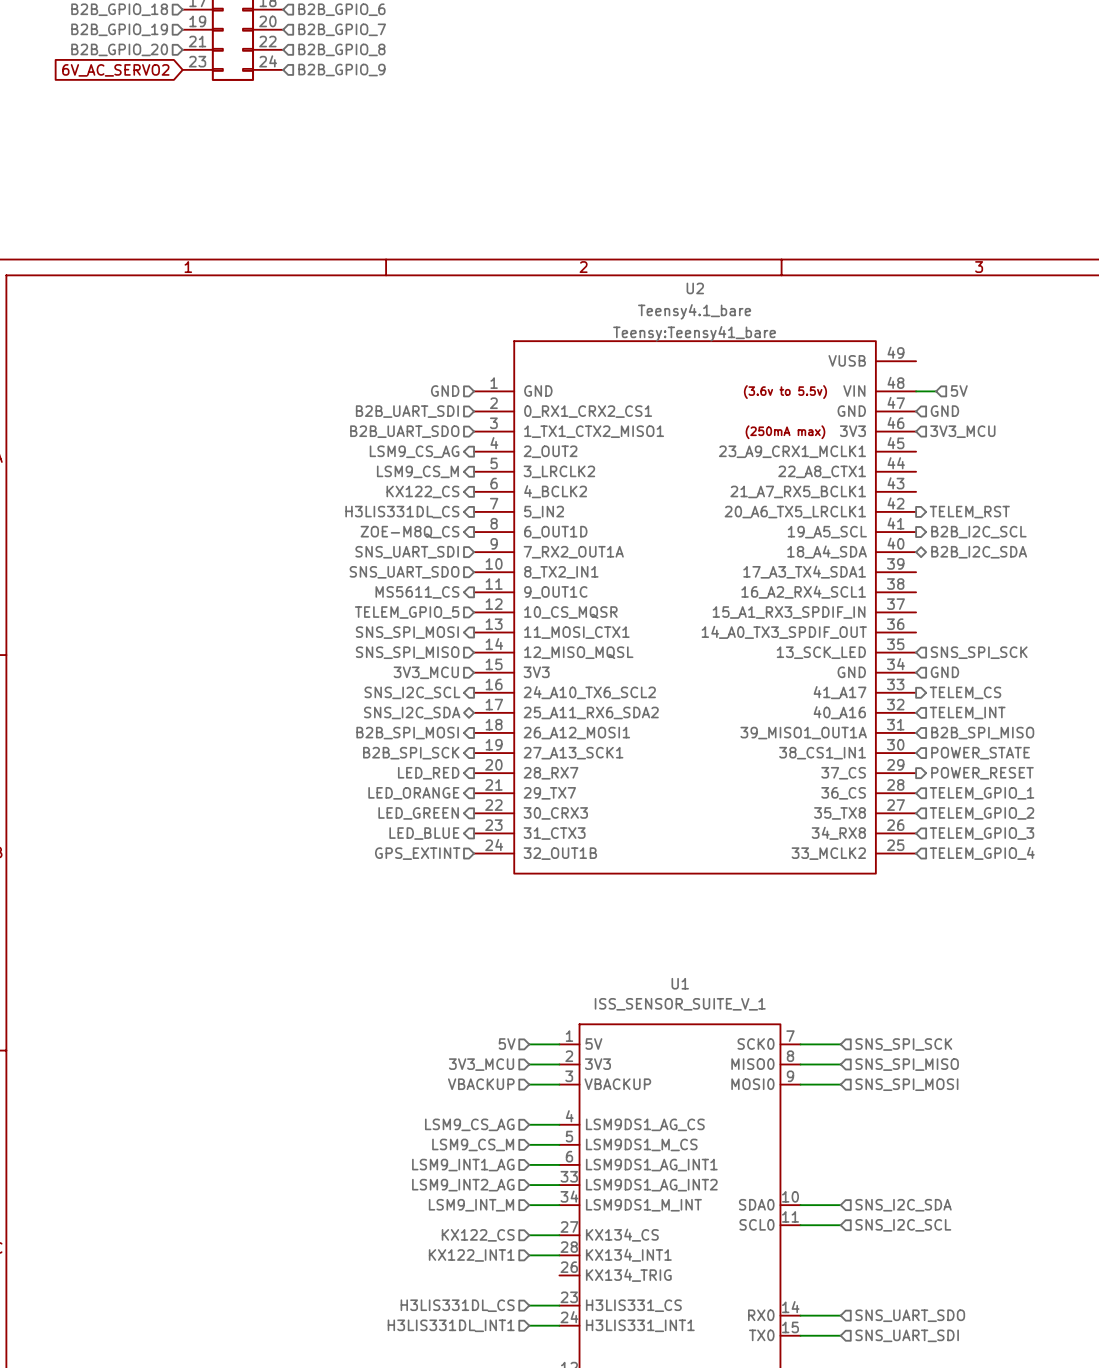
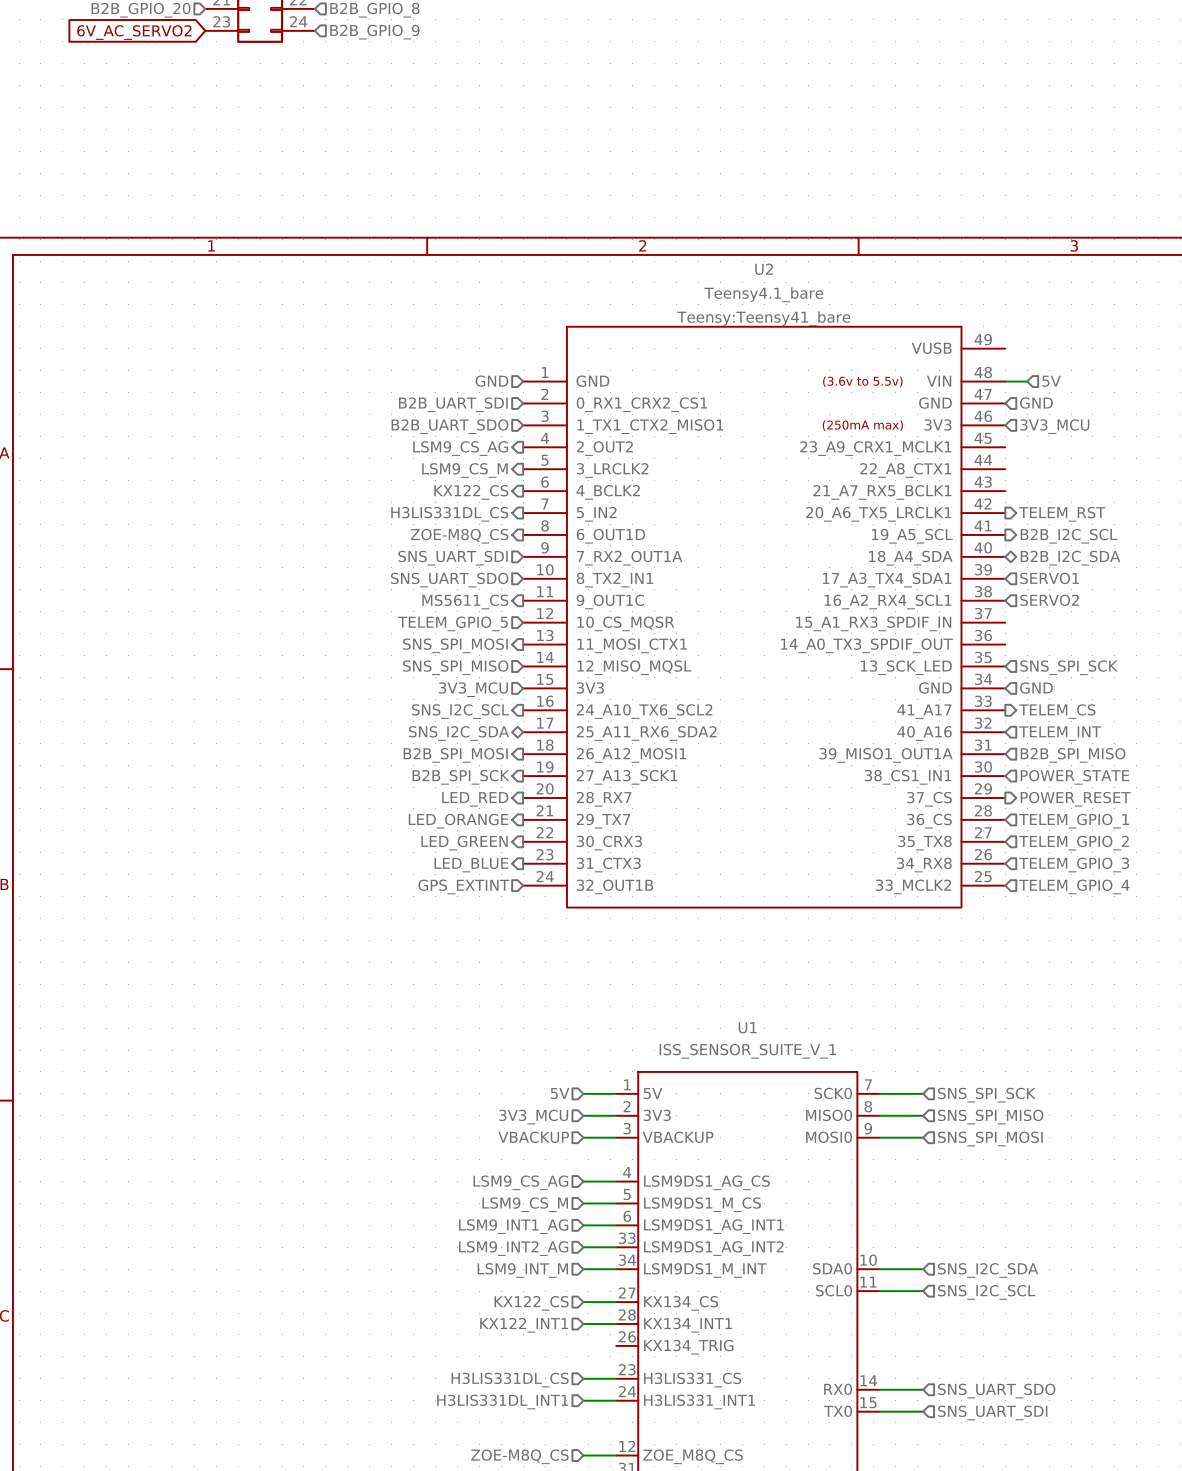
hierarchical label: none -> SERVO1 (1049, 578)
hierarchical label: none -> SERVO2 (1049, 600)

